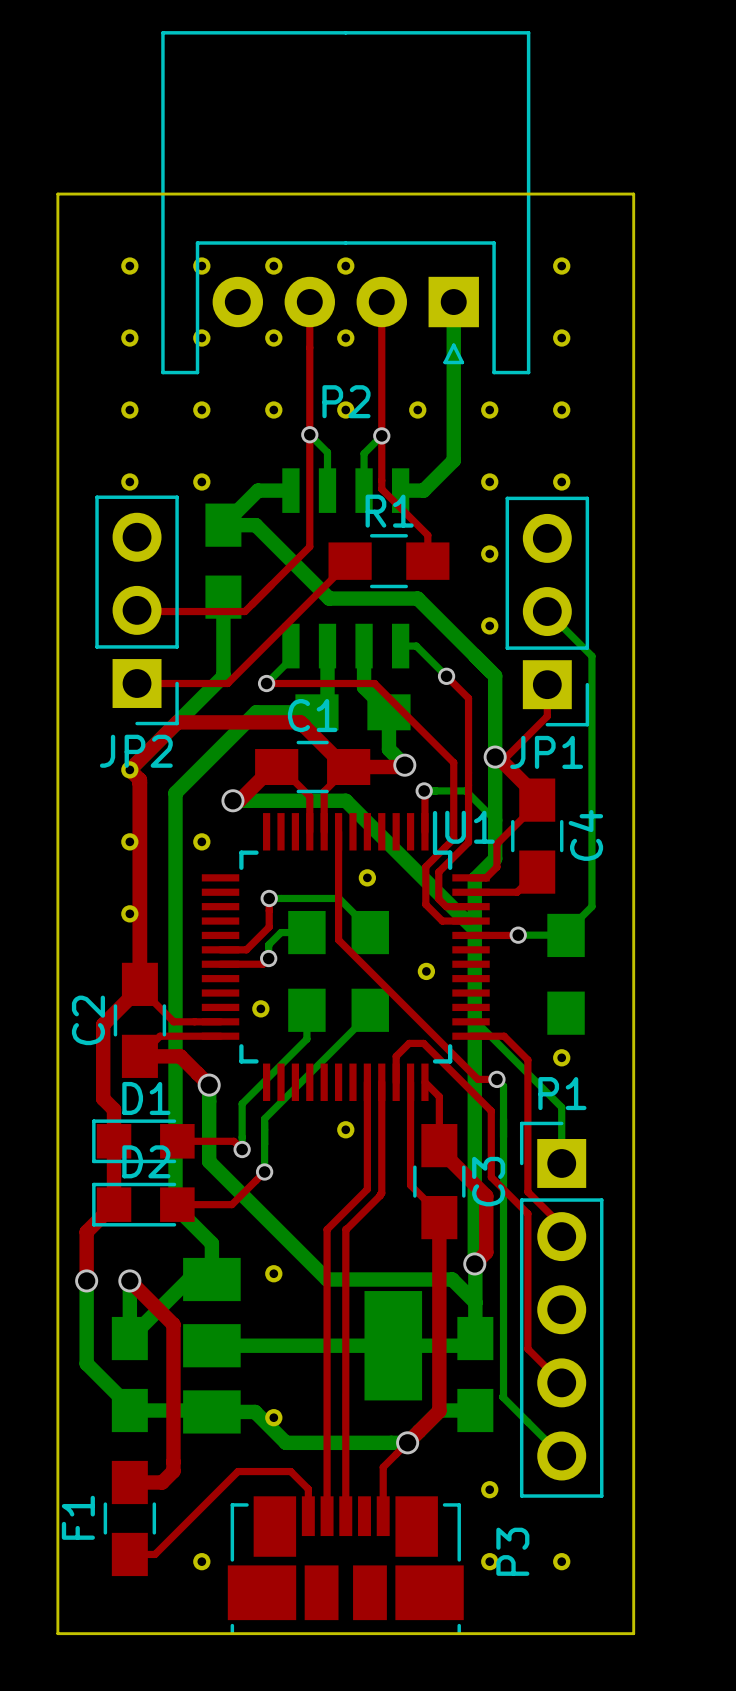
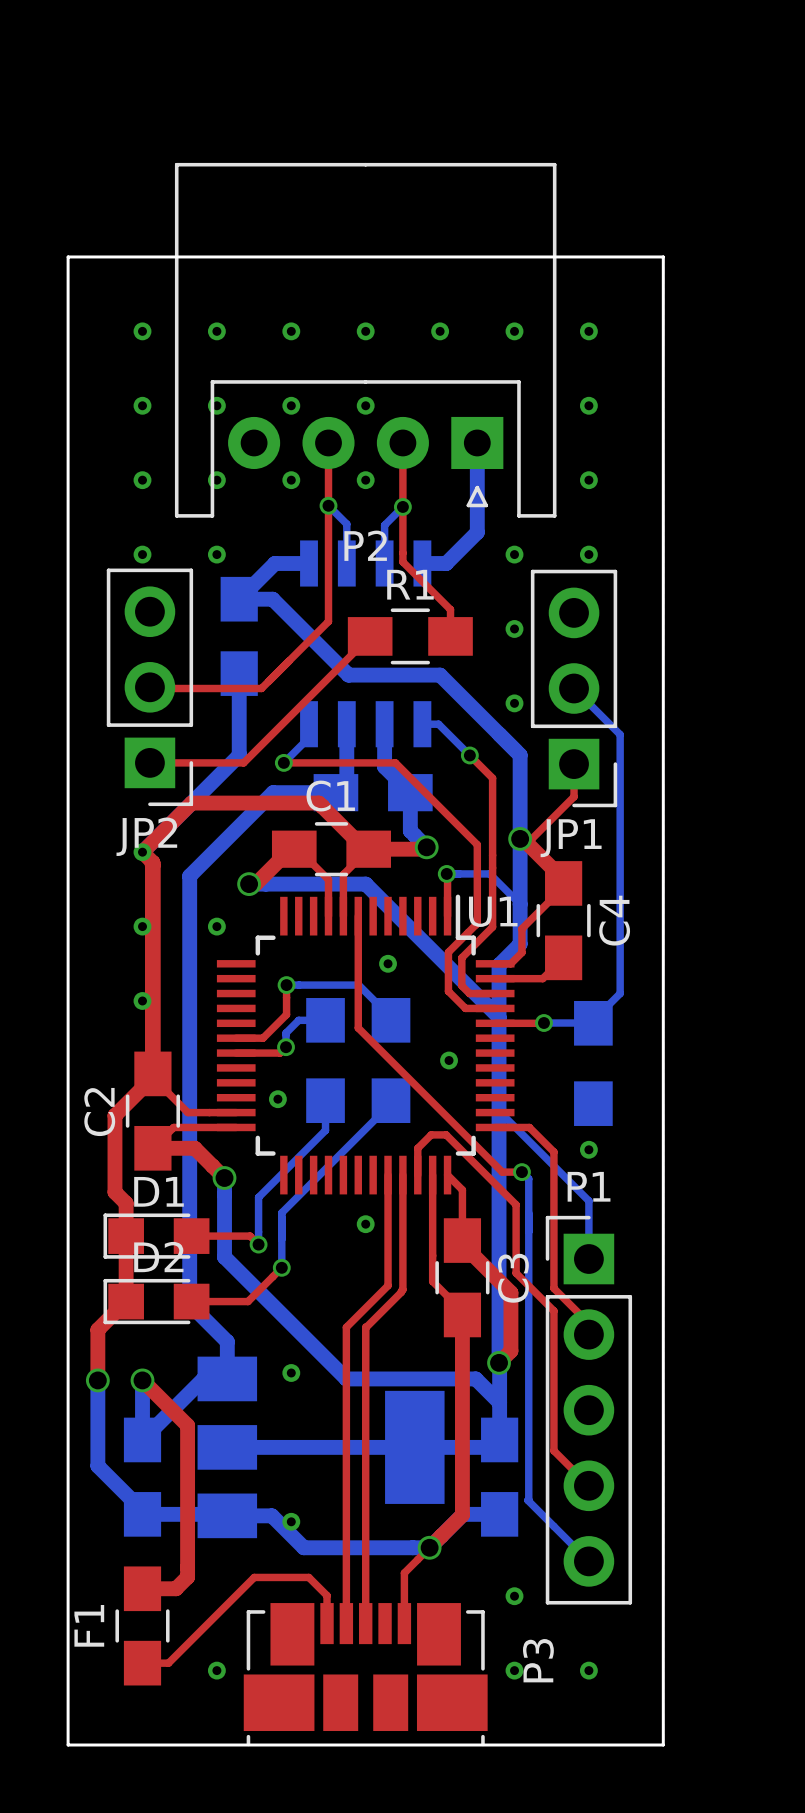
P2 position: (345, 202) -> (365, 340)
part: none -> (440, 331)
part: none -> (514, 331)
top track: (309, 312) (309, 374) -> none
top track: (381, 312) (381, 374) -> none
bottom track: (453, 312) (453, 374) -> none
part: (417, 409) -> none
part: (489, 409) -> none

